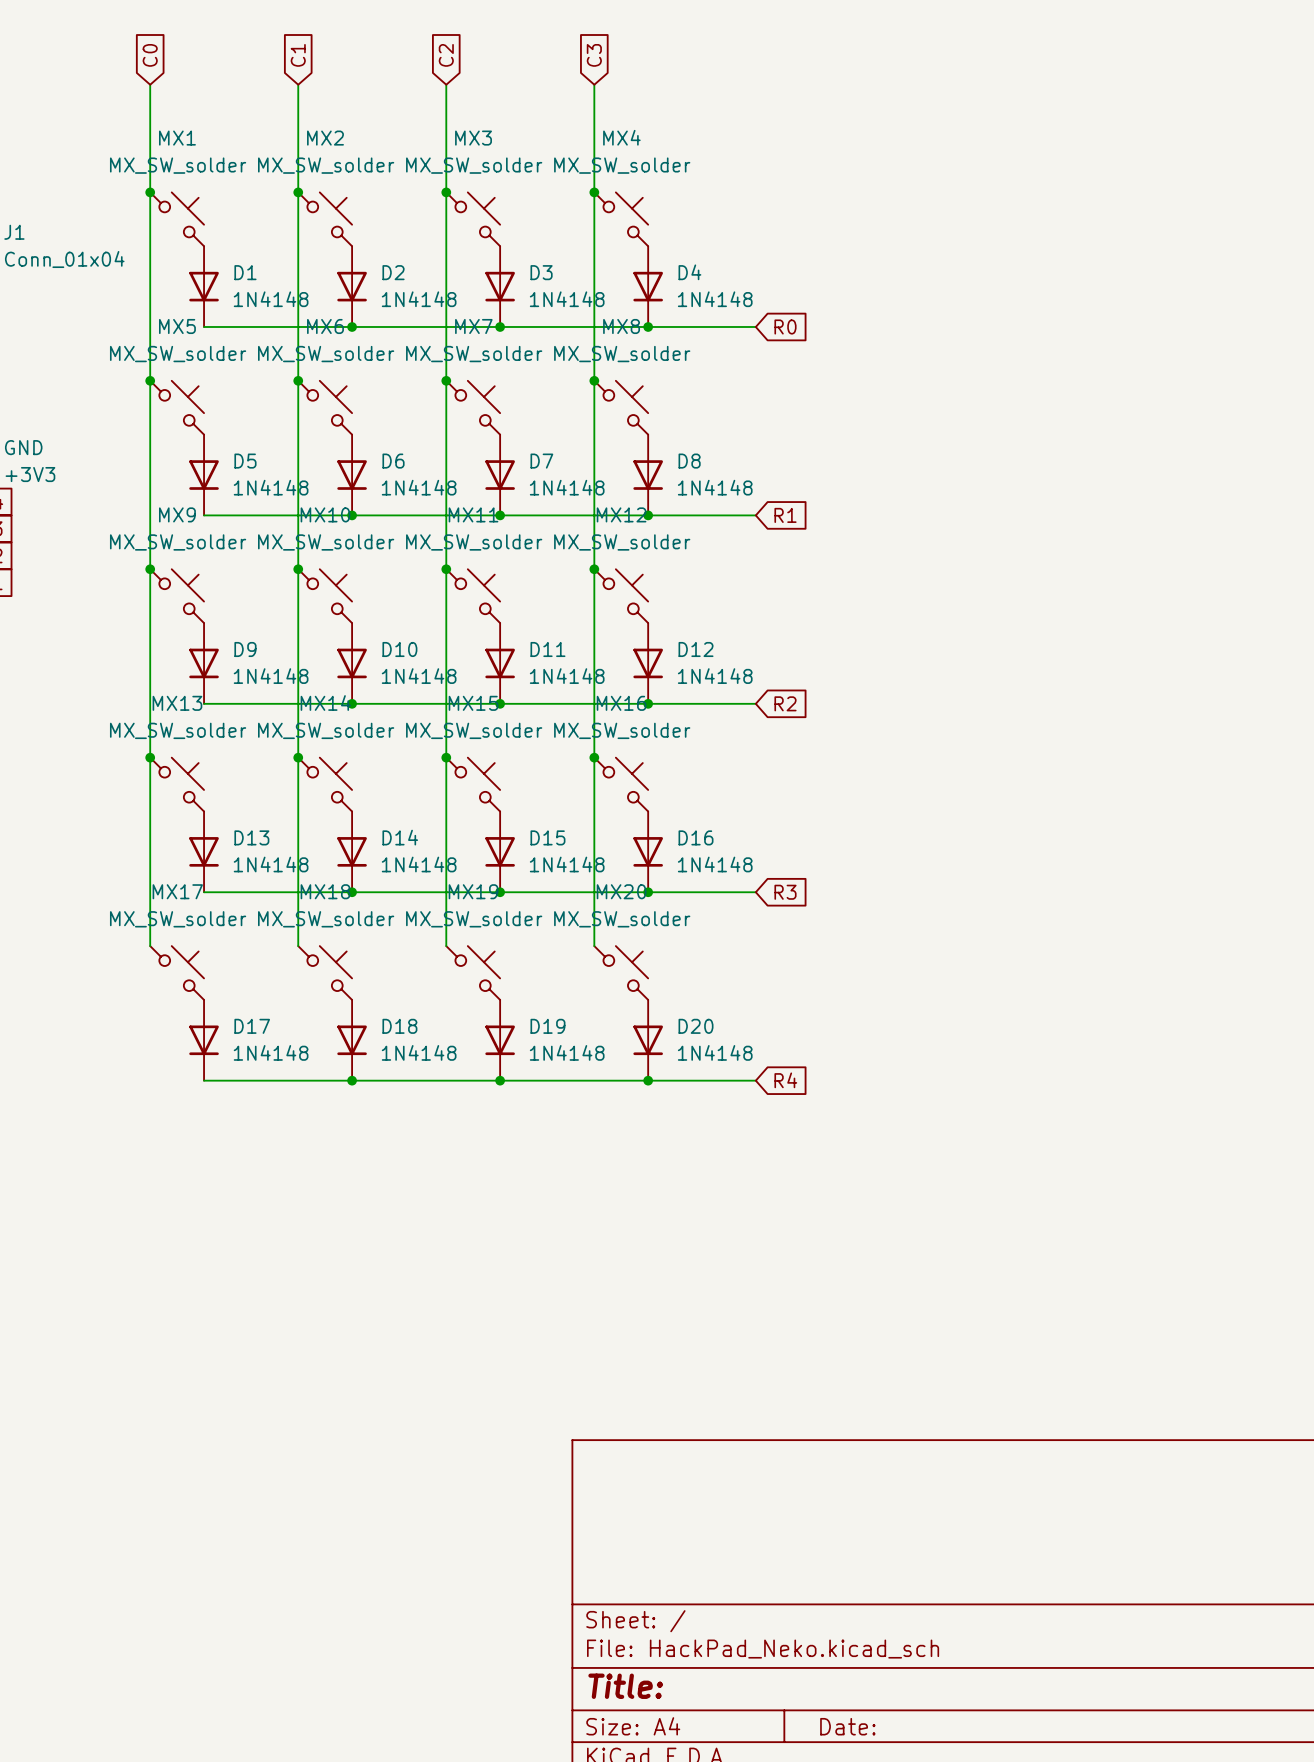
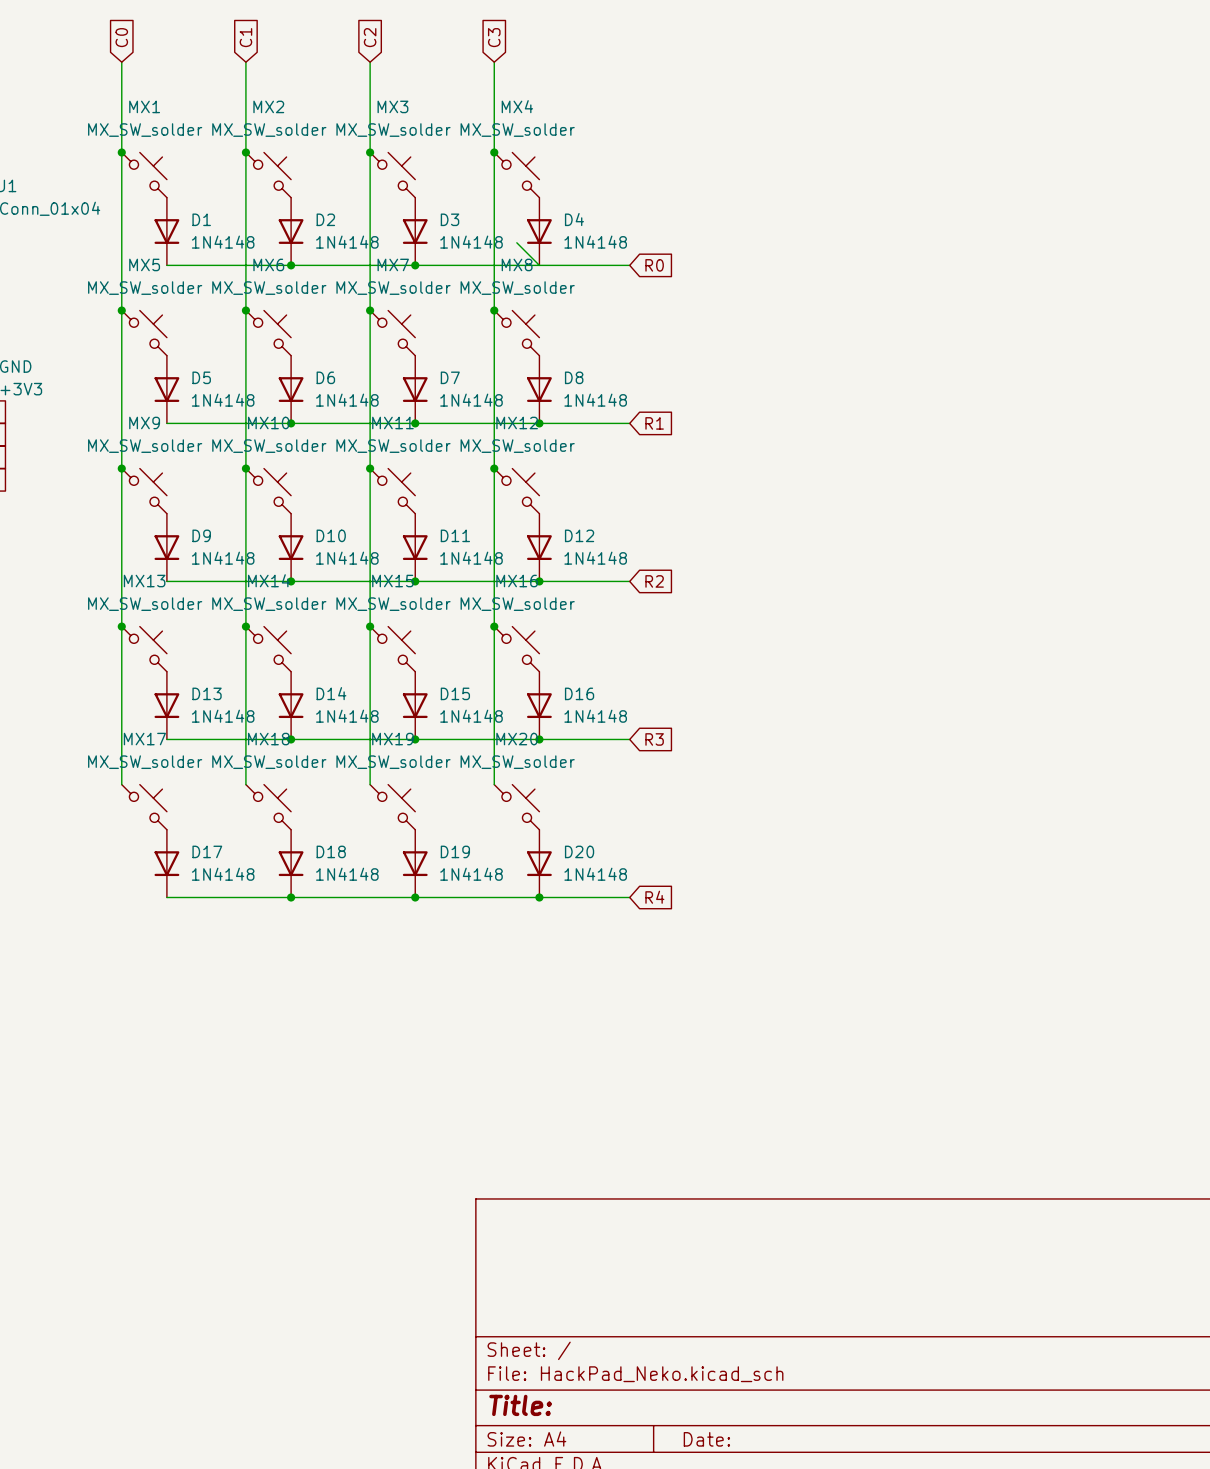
wire: none -> (516, 242) (539, 265)
junction: (648, 326) -> none

